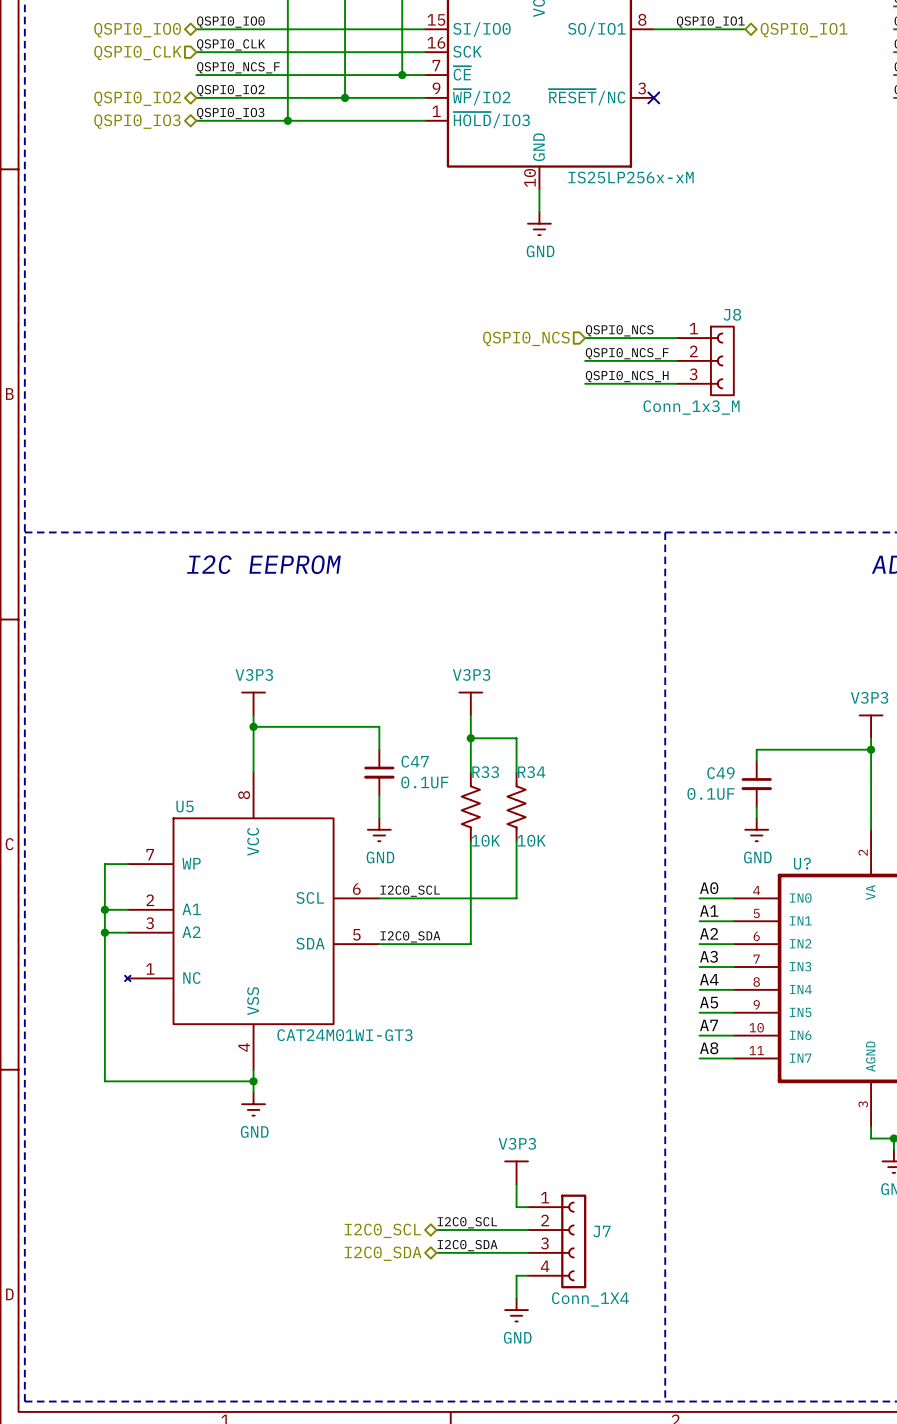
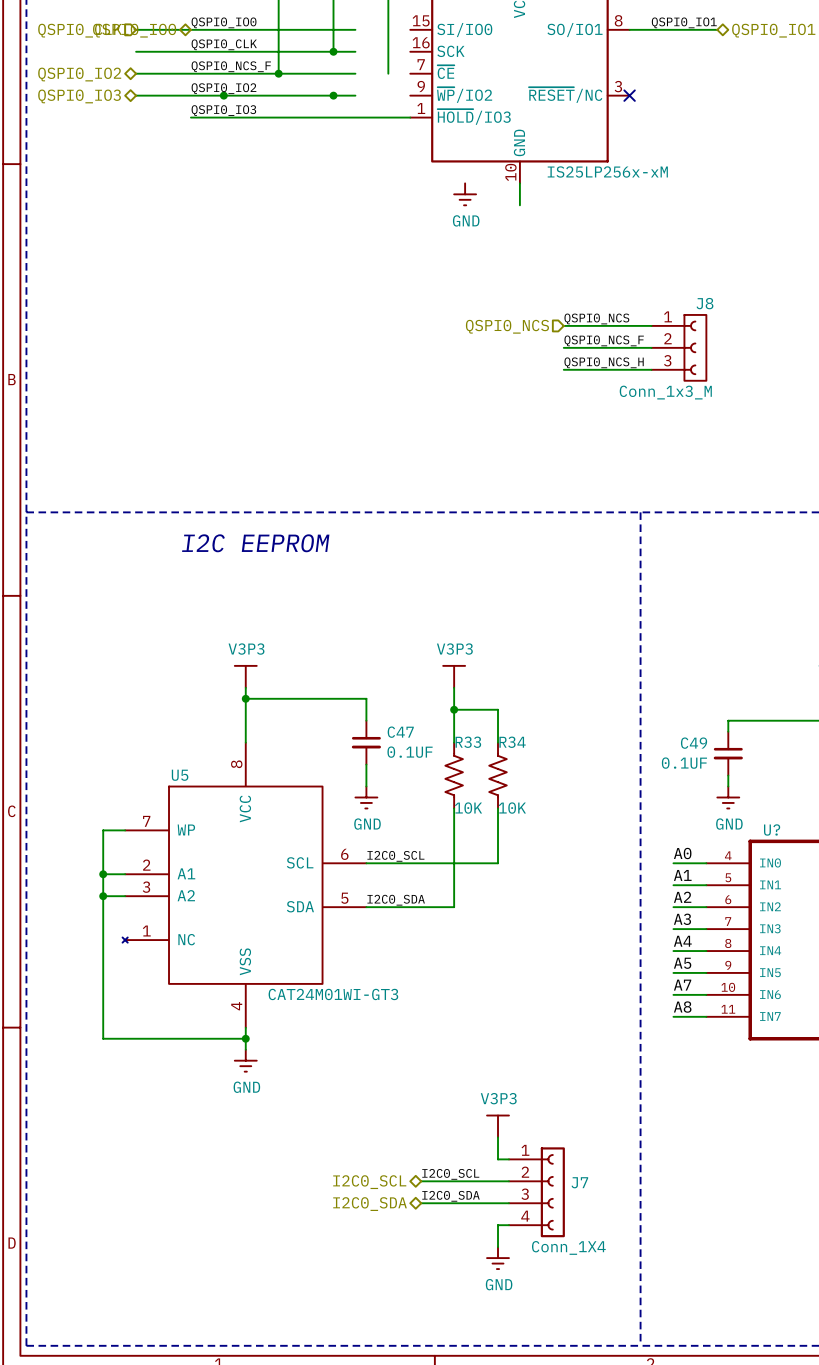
wire: none -> (136, 29) (190, 29)
wire: (367, 29) (425, 29) -> none
wire: none -> (136, 51) (190, 51)
wire: (345, 52) (345, 97) -> none
junction: none -> (333, 51)
wire: (367, 52) (425, 52) -> none
hierarchical label position: QSPI0_CLK (137, 53) -> QSPI0_CLK (80, 30)
wire: none -> (136, 73) (190, 73)
wire: (287, 75) (287, 120) -> none
junction: none -> (278, 73)
wire: (367, 75) (425, 75) -> none
junction: (402, 75) -> none
wire: none -> (136, 95) (190, 95)
junction: none -> (223, 95)
wire: (367, 97) (425, 97) -> none
hierarchical label position: QSPI0_IO2 (137, 98) -> QSPI0_IO2 (79, 74)
junction: (287, 120) -> none
hierarchical label position: QSPI0_IO3 (137, 121) -> QSPI0_IO3 (79, 96)
power symbol position: GND (539, 223) -> GND (465, 194)

